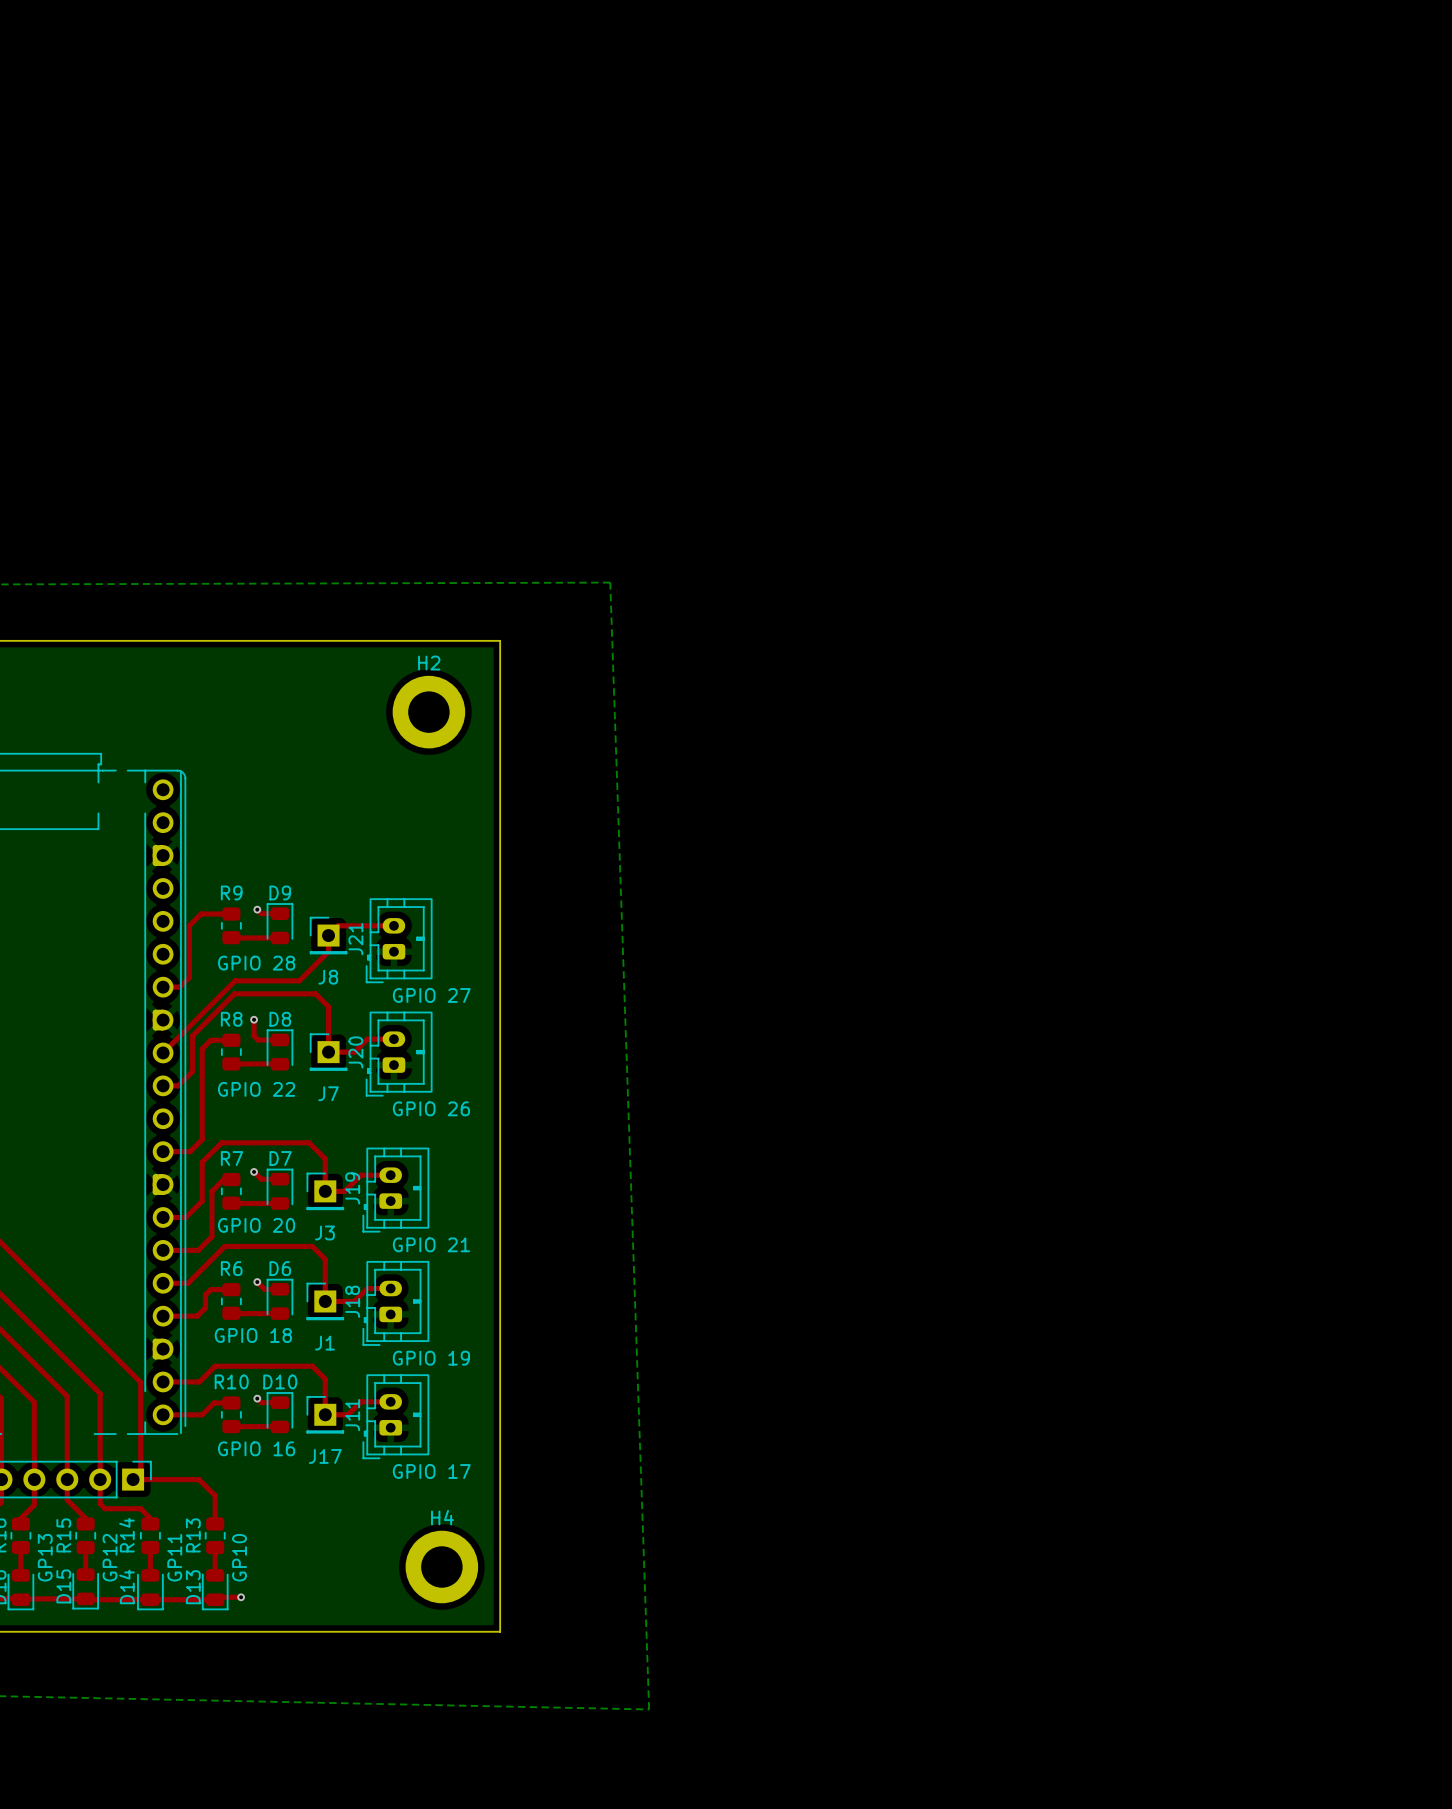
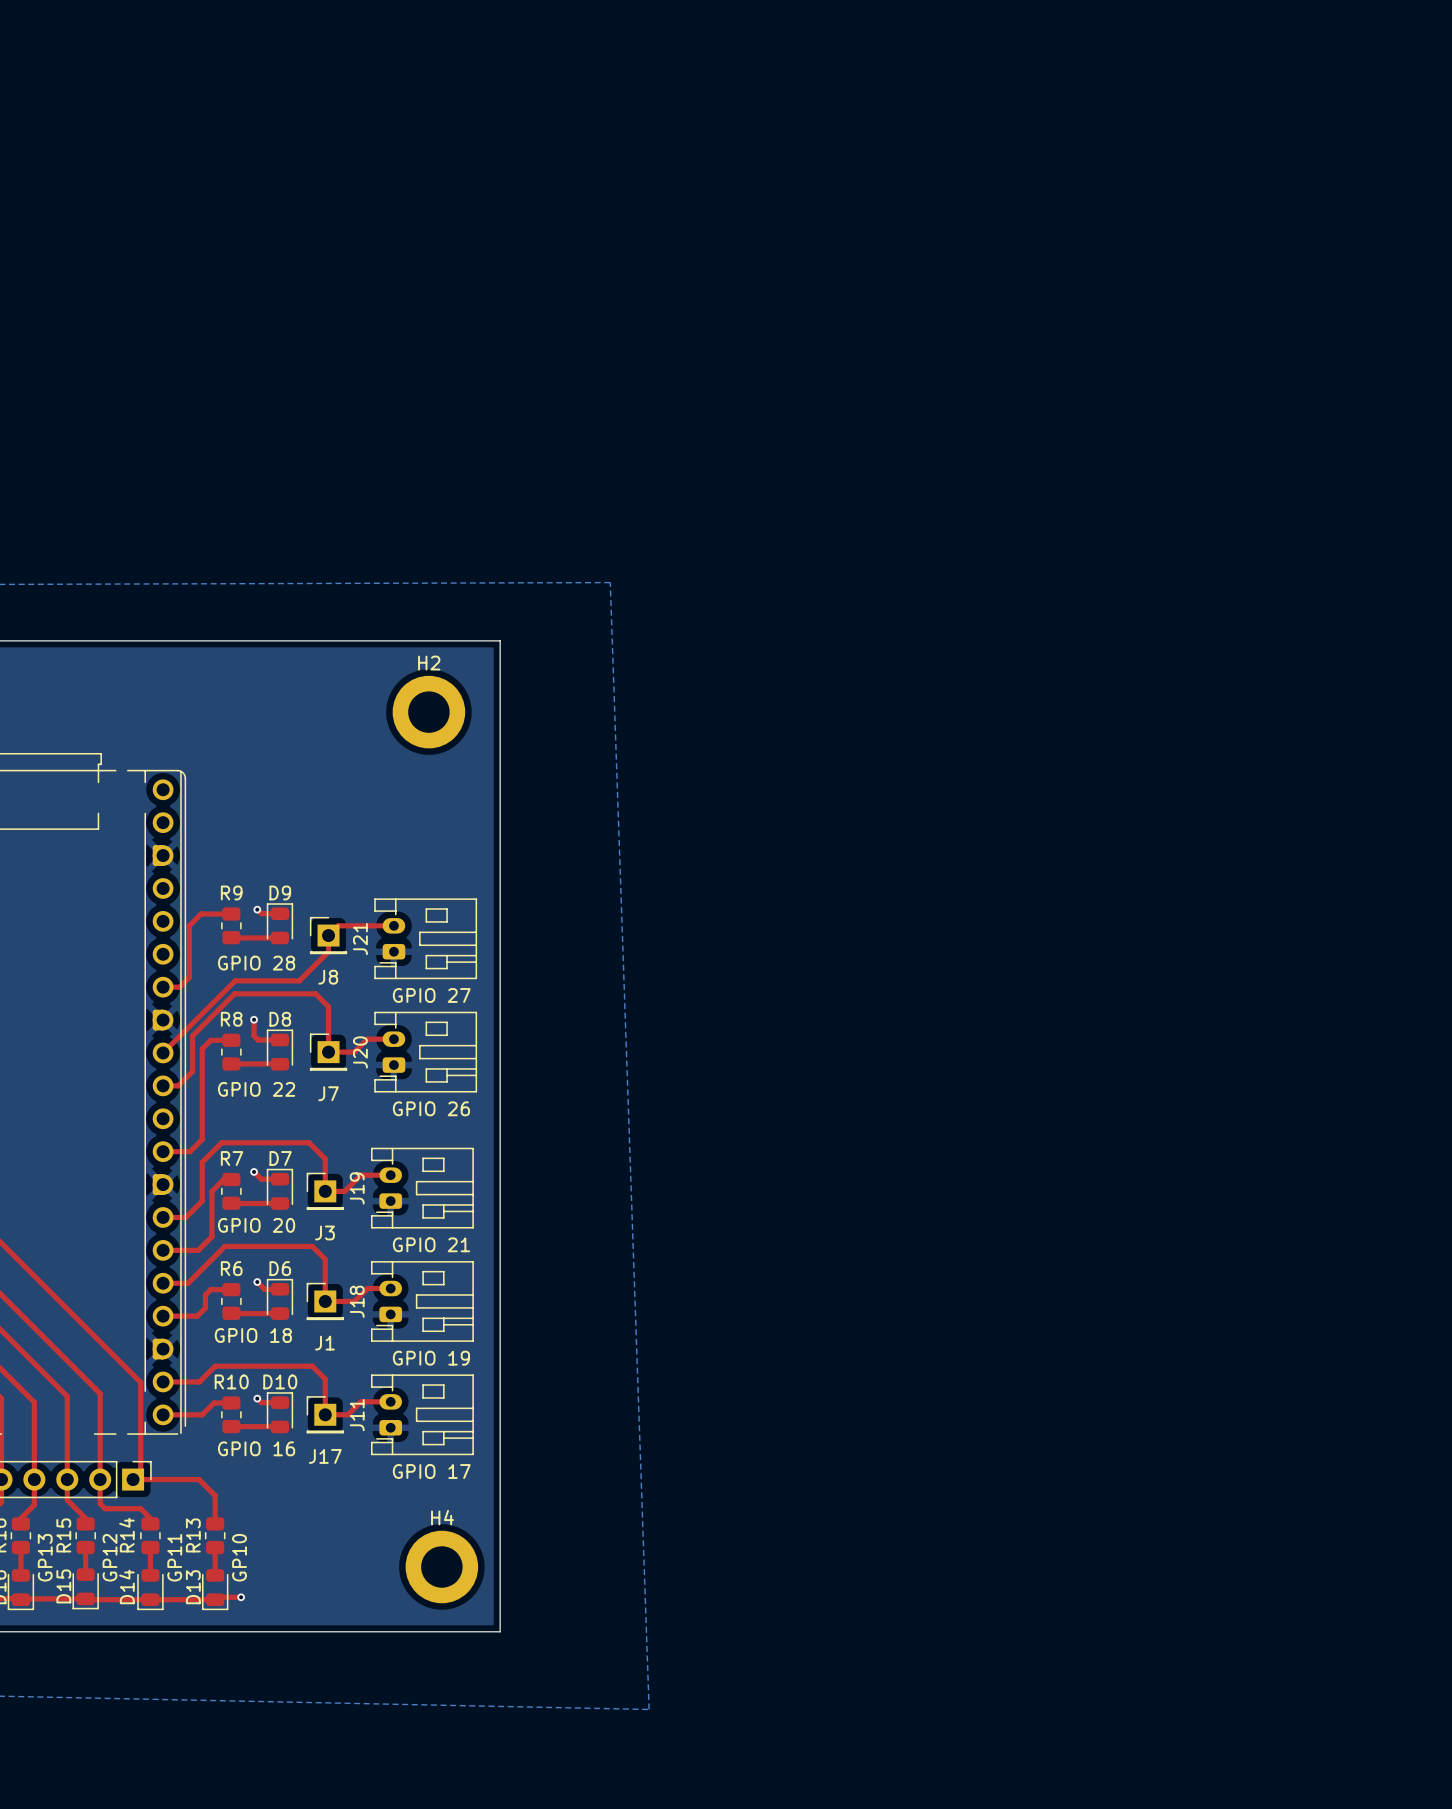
J21 footprint: [365, 898, 433, 984] -> [374, 898, 478, 980]
J20 footprint: [365, 1011, 433, 1097] -> [374, 1011, 478, 1093]
J19 footprint: [362, 1147, 430, 1233] -> [371, 1147, 474, 1229]
J18 footprint: [362, 1261, 430, 1346] -> [371, 1261, 474, 1342]
J11 footprint: [362, 1374, 430, 1460] -> [371, 1374, 474, 1456]

